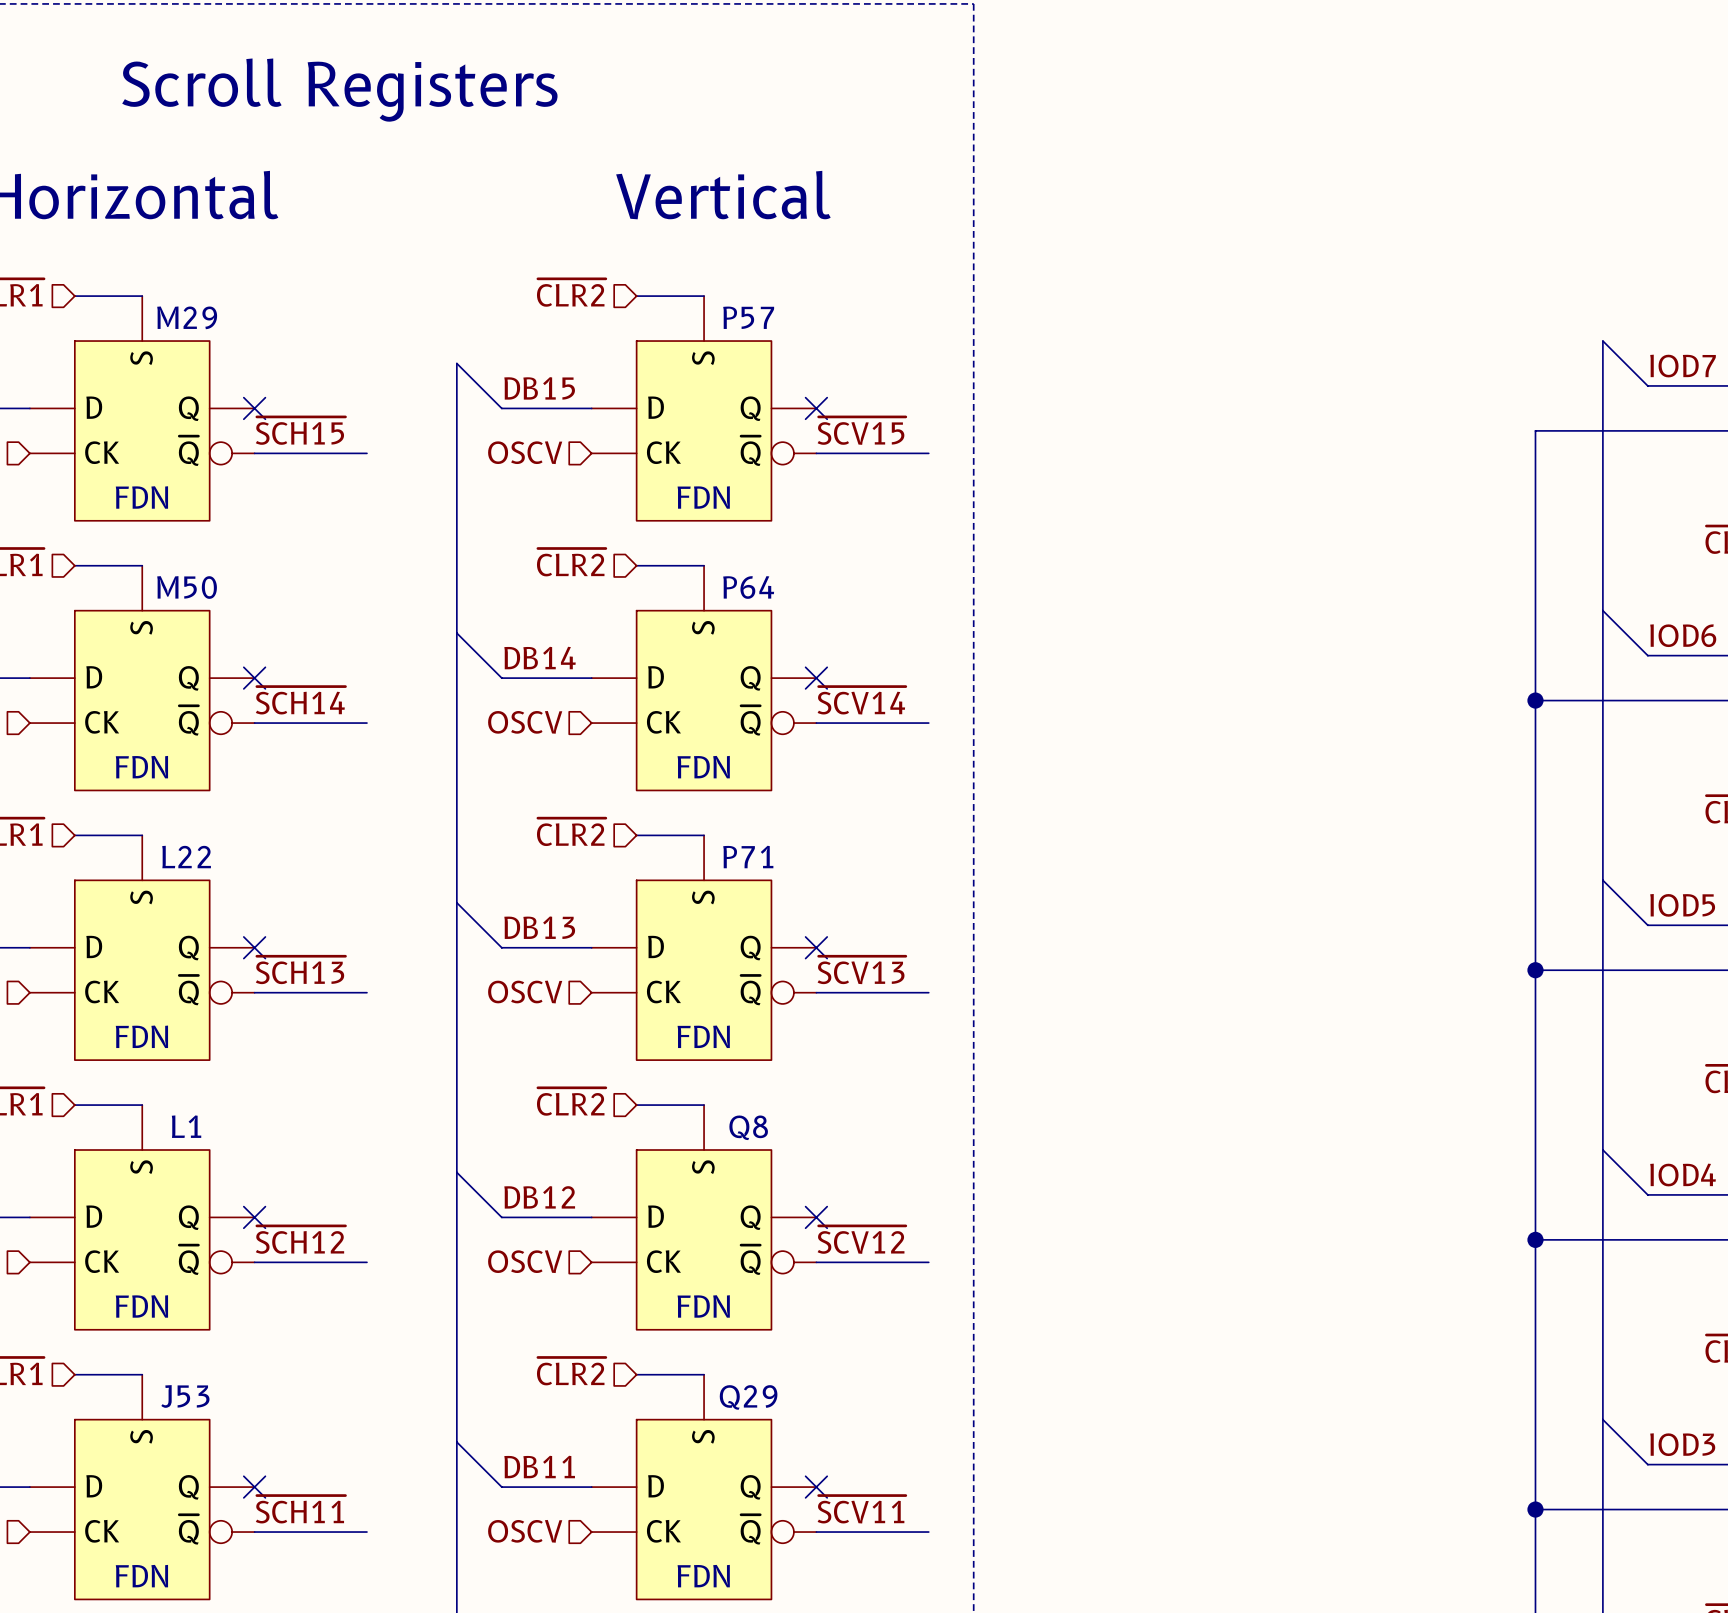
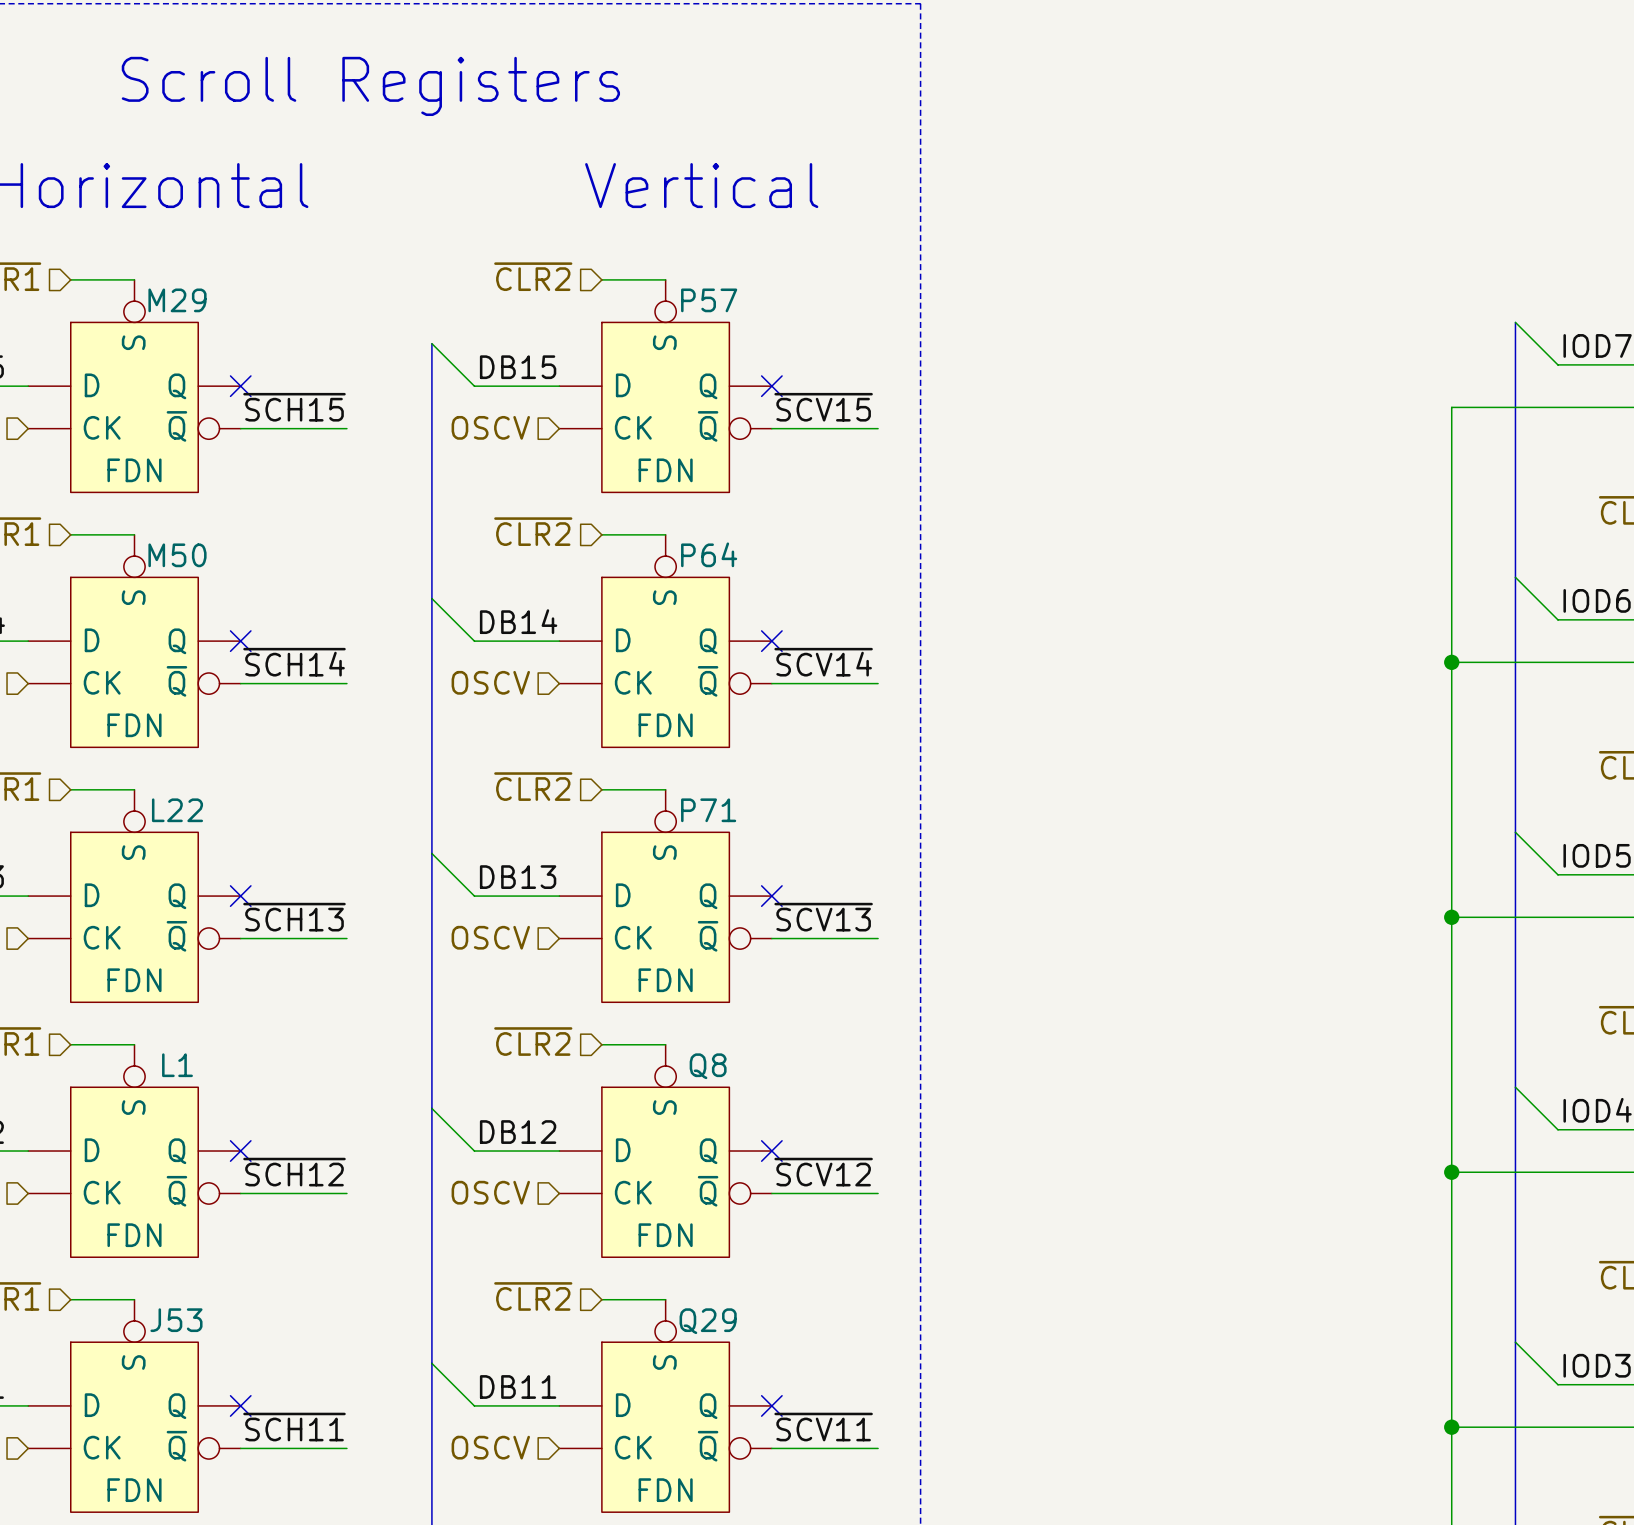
M29 symbol: [29, 296, 255, 521] -> [28, 279, 241, 493]
P57 symbol: [591, 296, 817, 521] -> [559, 279, 772, 493]
M50 symbol: [29, 565, 255, 791] -> [28, 534, 241, 748]
P64 symbol: [591, 565, 817, 791] -> [559, 534, 772, 748]
L22 symbol: [29, 835, 255, 1061] -> [28, 789, 241, 1003]
P71 symbol: [591, 835, 817, 1061] -> [559, 789, 772, 1003]
L1 symbol: [29, 1105, 255, 1330] -> [28, 1044, 241, 1258]
Q8 symbol: [591, 1105, 817, 1330] -> [559, 1044, 772, 1258]
J53 symbol: [29, 1374, 255, 1600] -> [28, 1299, 241, 1513]
Q29 symbol: [591, 1374, 817, 1600] -> [559, 1299, 772, 1513]

